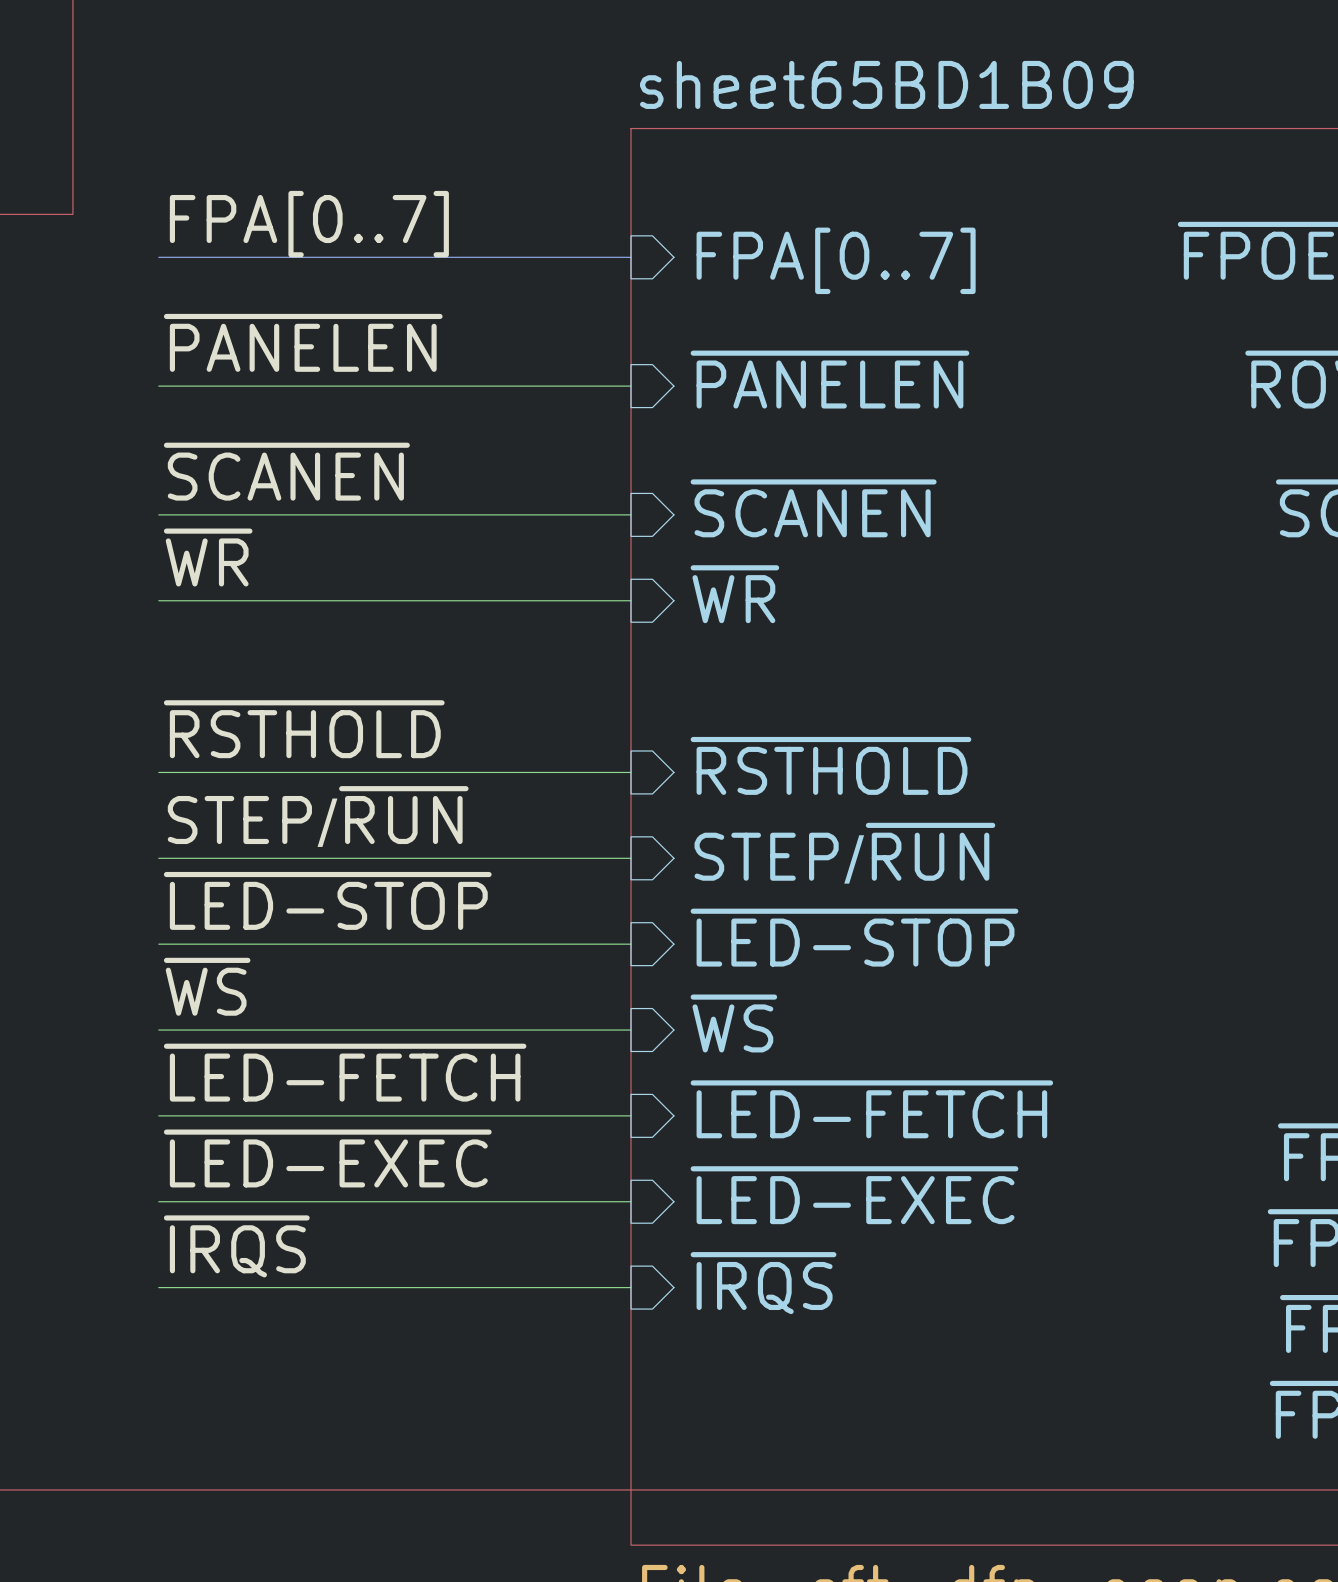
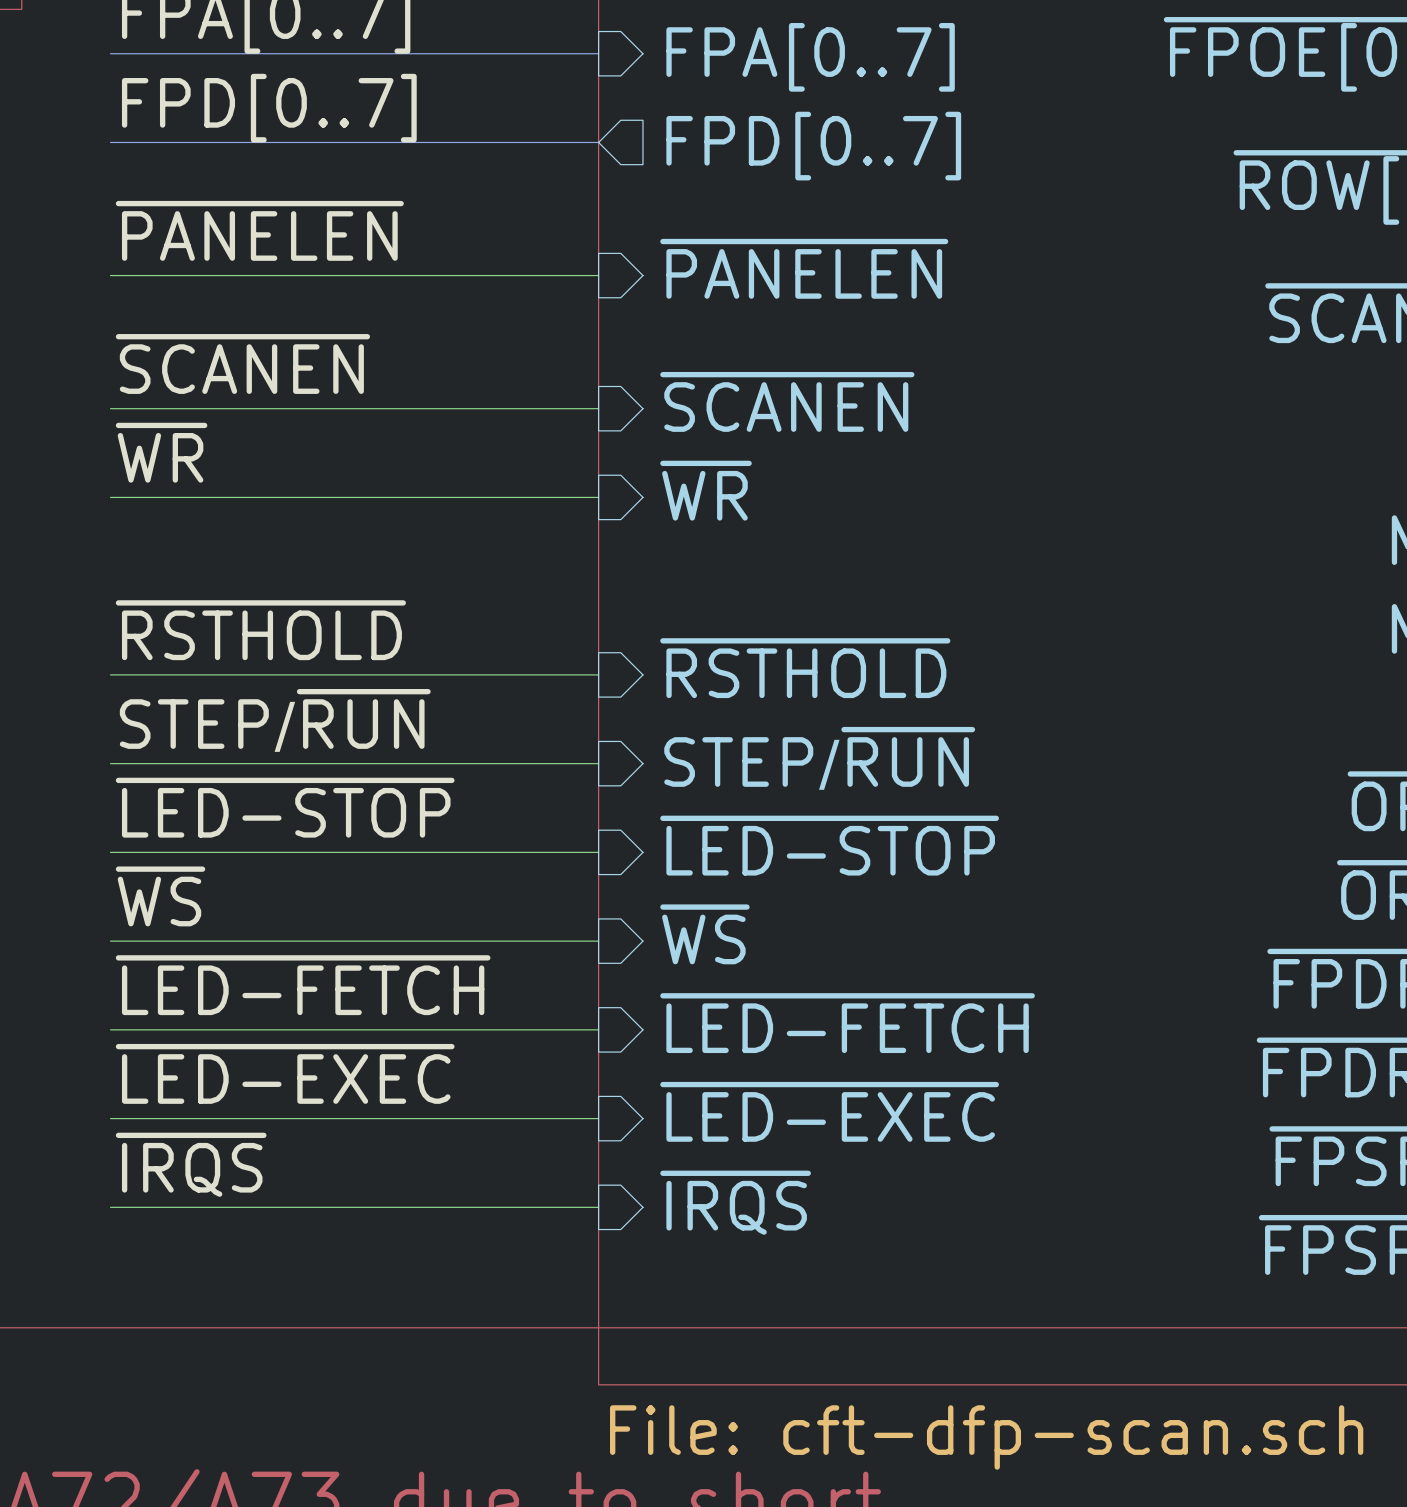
label: none -> FPD[0..7] (269, 108)
label position: ~{PANELEN} (303, 342) -> ~{PANELEN} (259, 230)
bus: none -> (110, 142) (598, 142)
sheet pin: none -> FPD[0..7] (813, 146)
sheet pin position: ~{PANELEN} (829, 379) -> ~{PANELEN} (804, 268)
wire: (158, 386) (631, 386) -> none
label: ~{SCANEN} (286, 471) -> none
sheet pin: ~{SCANEN} (813, 508) -> none
wire: (158, 514) (631, 514) -> (110, 275) (598, 275)
label: ~{WR} (208, 557) -> ~{SCANEN} (242, 363)
sheet pin: ~{WR} (734, 594) -> ~{SCANEN} (787, 401)
label: none -> ~{WR} (161, 452)
sheet pin: none -> ~{WR} (706, 490)
label: ~{RSTHOLD} (304, 729) -> none
sheet pin: ~{RSTHOLD} (830, 765) -> none
wire: (158, 772) (631, 772) -> (110, 497) (598, 497)
label: STEP∕~{RUN} (318, 817) -> ~{RSTHOLD} (260, 630)
sheet pin: STEP∕~{RUN} (844, 854) -> ~{RSTHOLD} (805, 668)
label: ~{LED-STOP} (327, 900) -> STEP∕~{RUN} (275, 721)
sheet pin: ~{LED-STOP} (854, 937) -> STEP∕~{RUN} (819, 759)
label: ~{WS} (207, 986) -> ~{LED-STOP} (285, 807)
sheet pin: ~{WS} (733, 1023) -> ~{LED-STOP} (829, 845)
label: ~{LED-FETCH} (345, 1072) -> ~{WS} (160, 896)
sheet pin: ~{LED-FETCH} (871, 1109) -> ~{WS} (704, 934)
label: ~{LED-EXEC} (327, 1158) -> ~{LED-FETCH} (303, 985)
sheet pin: ~{LED-EXEC} (854, 1195) -> ~{LED-FETCH} (847, 1023)
label: ~{IRQS} (236, 1246) -> ~{LED-EXEC} (285, 1073)
sheet pin: ~{IRQS} (763, 1283) -> ~{LED-EXEC} (829, 1111)
label: none -> ~{IRQS} (191, 1164)
sheet pin: none -> ~{IRQS} (735, 1202)
wire: none -> (110, 1207) (598, 1207)

